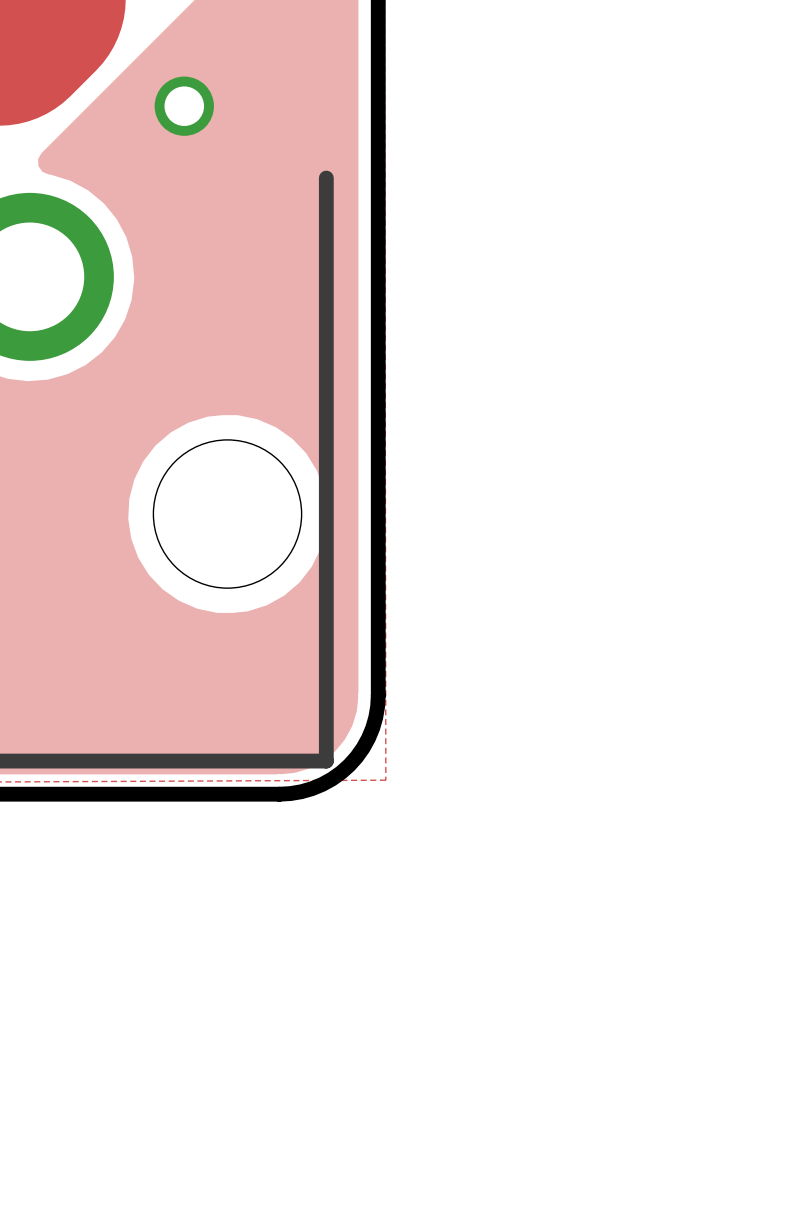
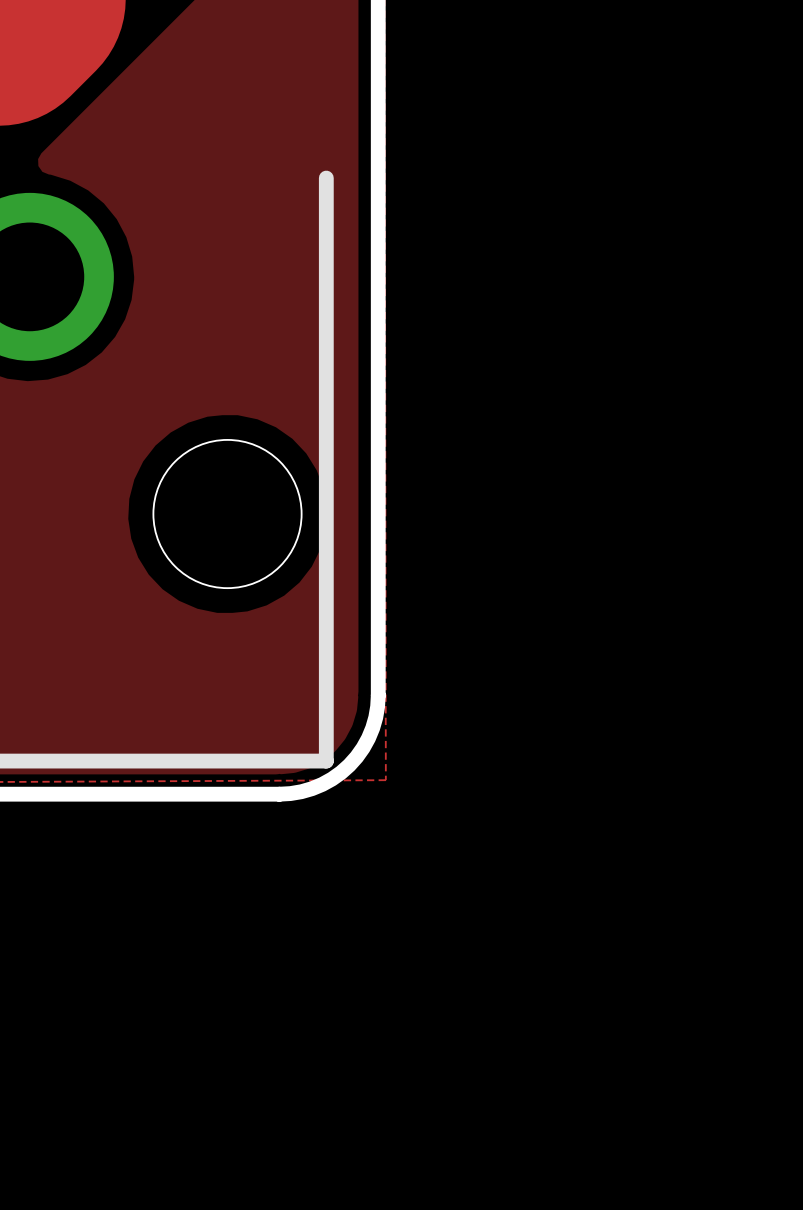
via: (184, 106) -> none

